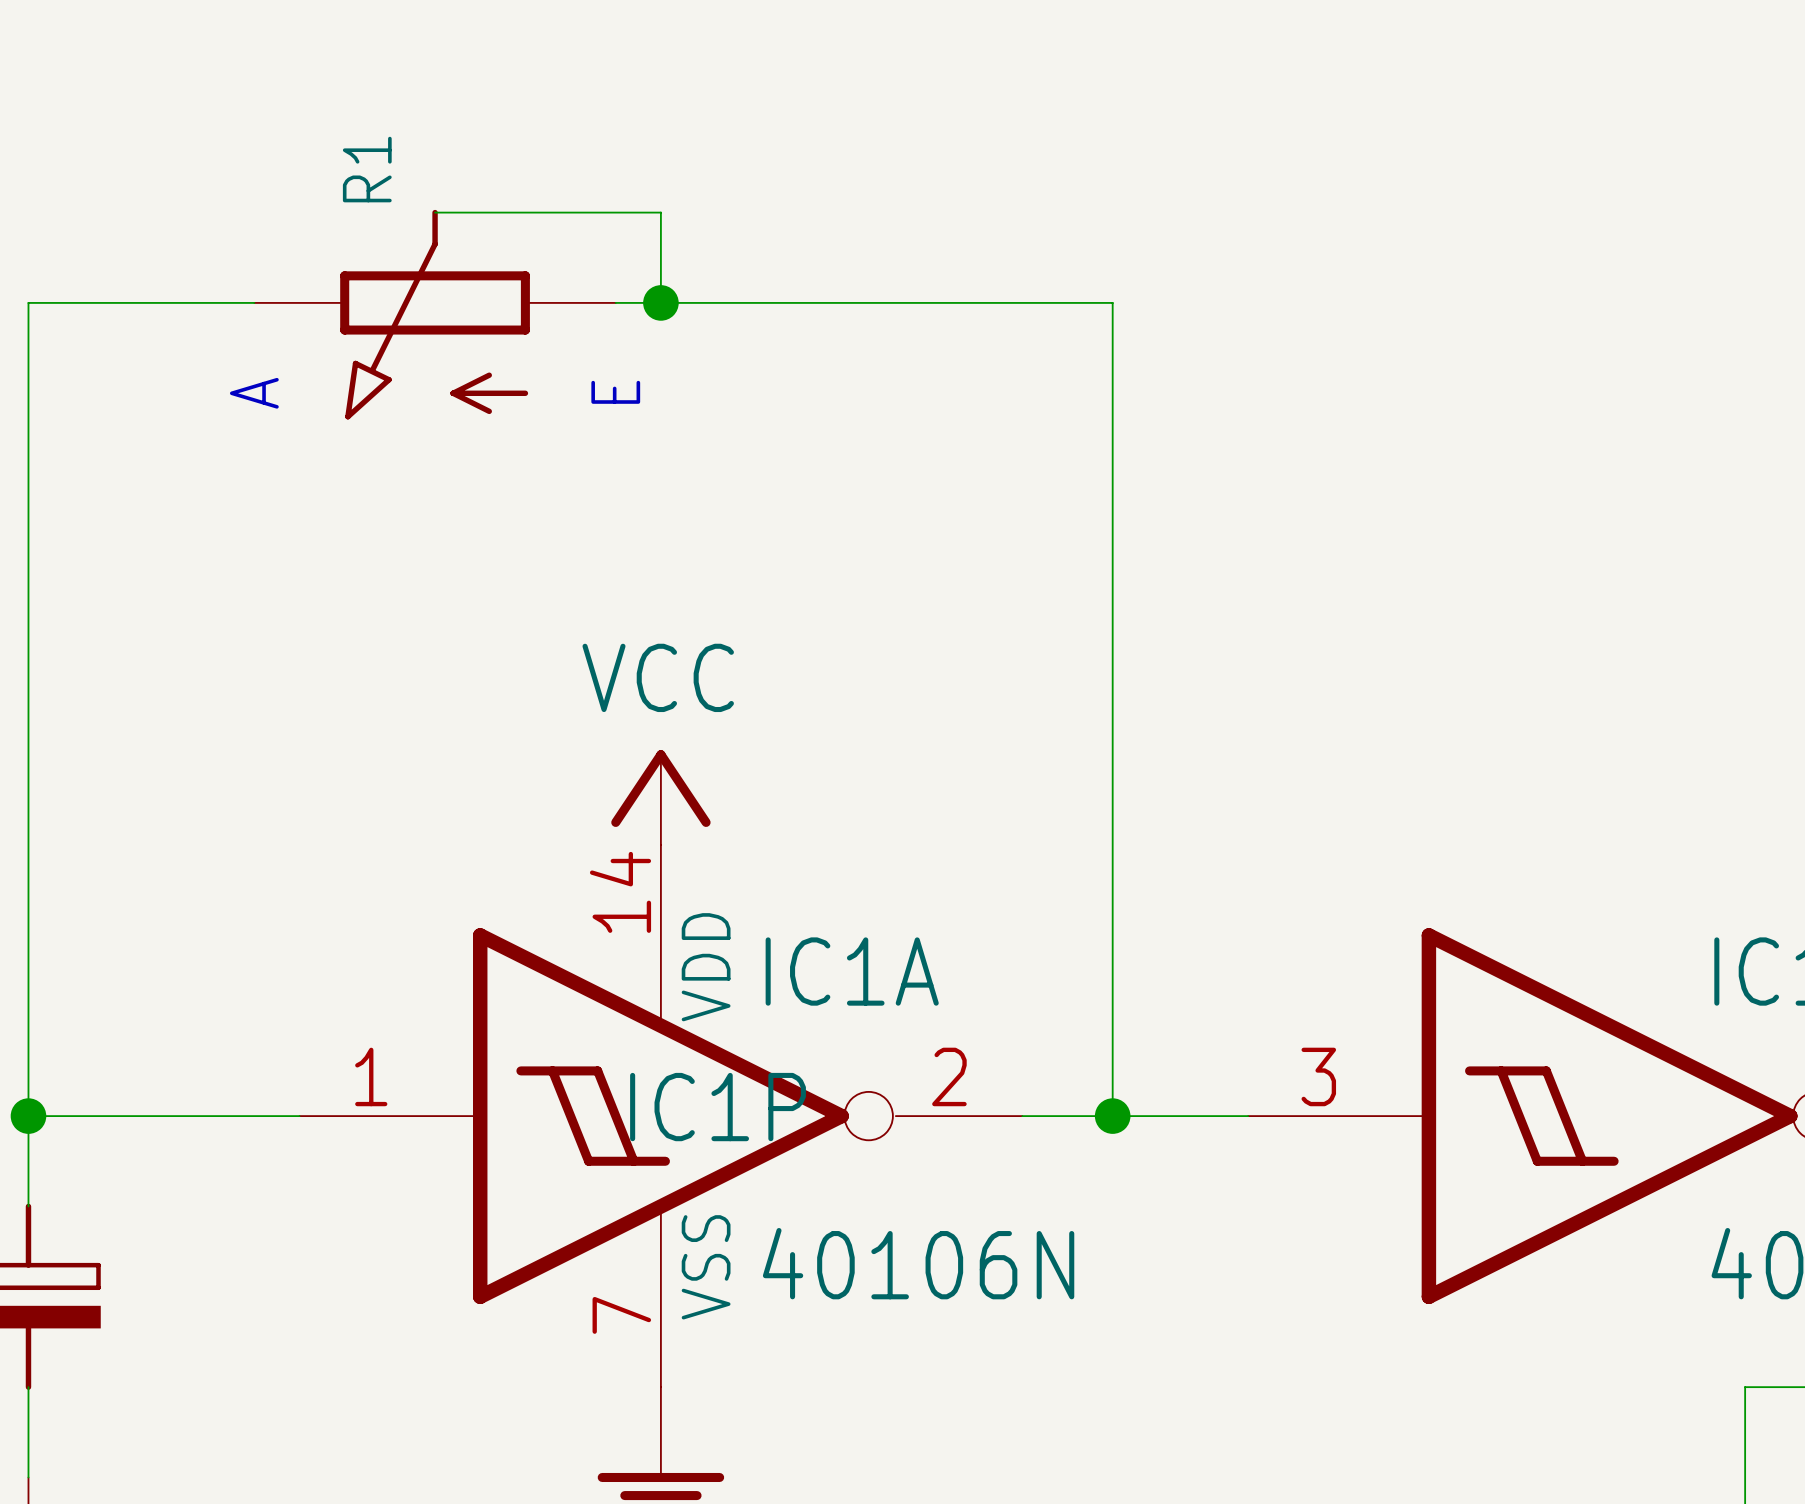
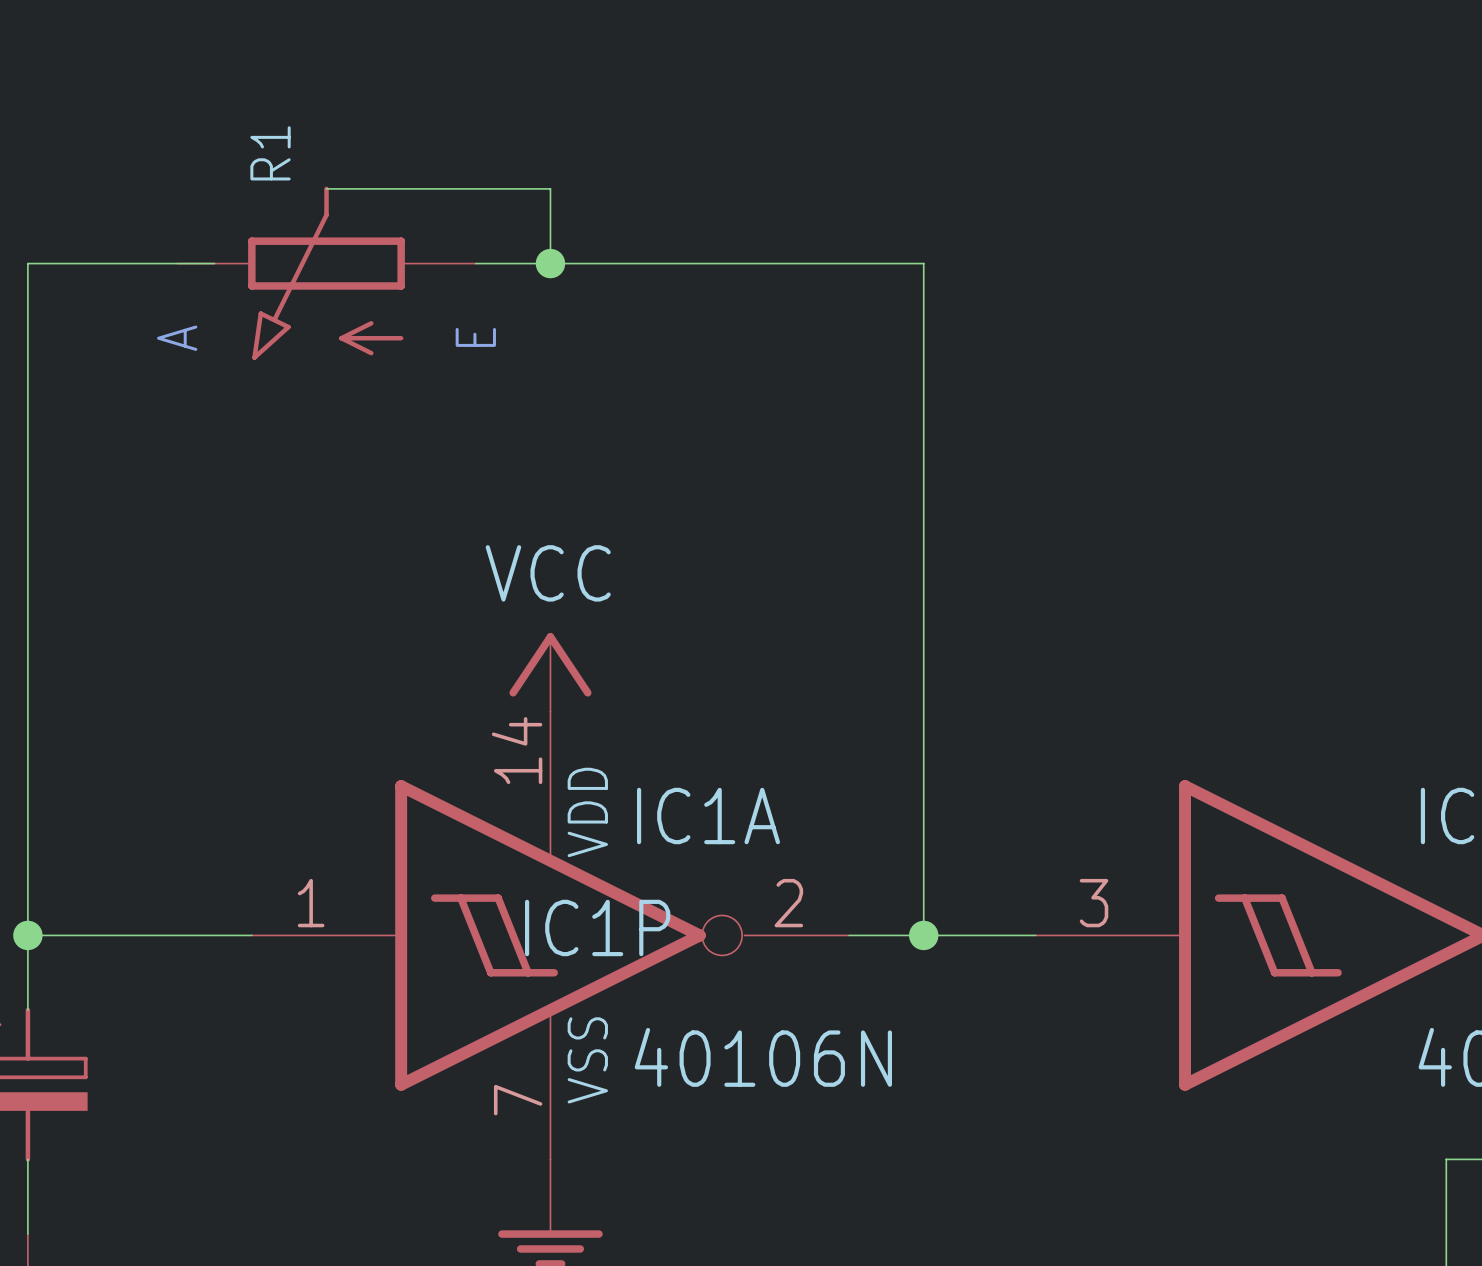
wire: none -> (326, 188) (363, 188)
R1 position: (435, 314) -> (326, 273)

